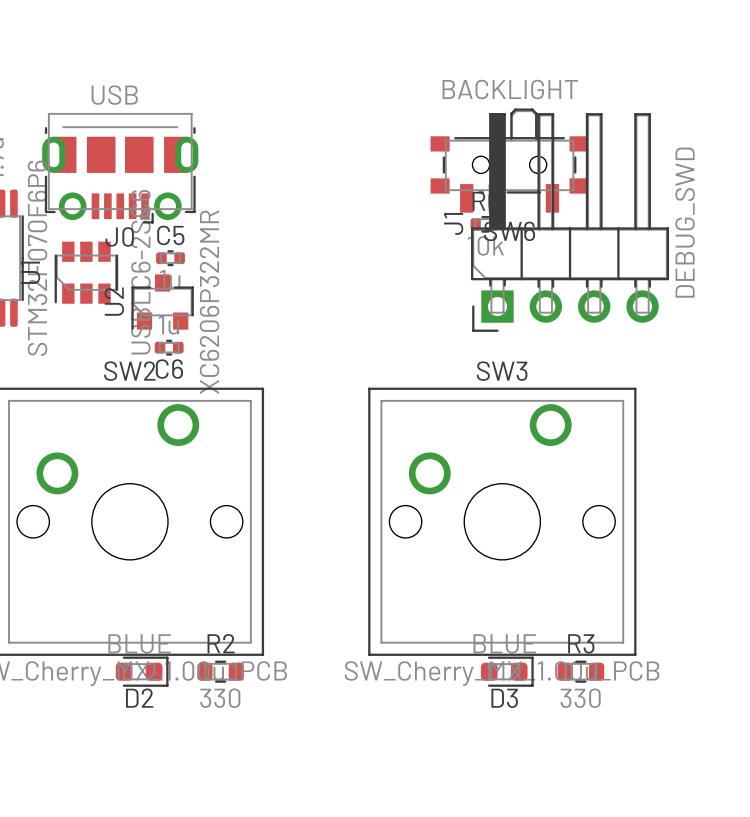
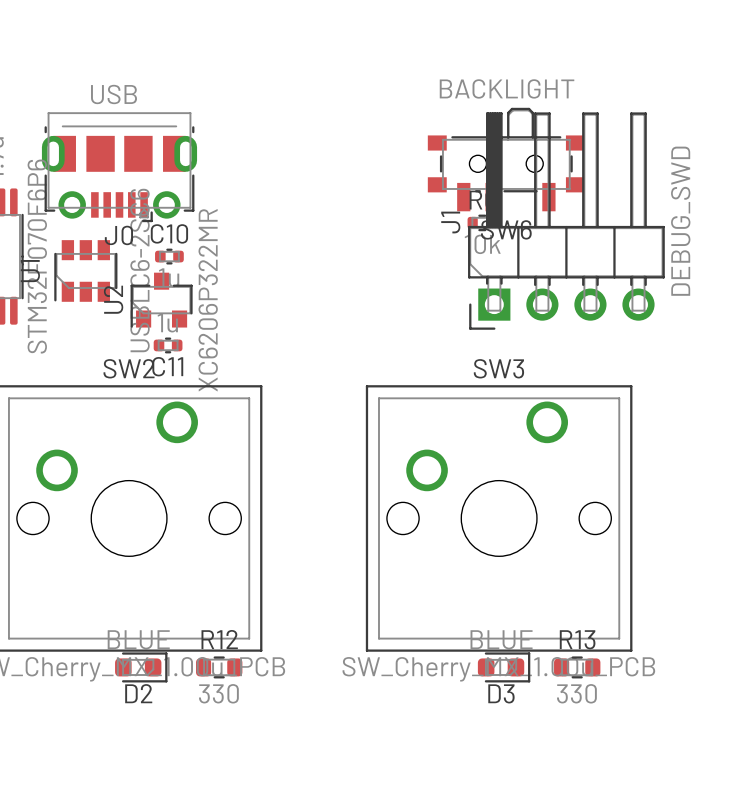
C5 name: C5 (170, 235) -> C10 (169, 233)
C6 name: C6 (169, 369) -> C11 (167, 366)
R2 name: R2 (221, 643) -> R12 (219, 639)
R3 name: R3 (581, 643) -> R13 (577, 639)

